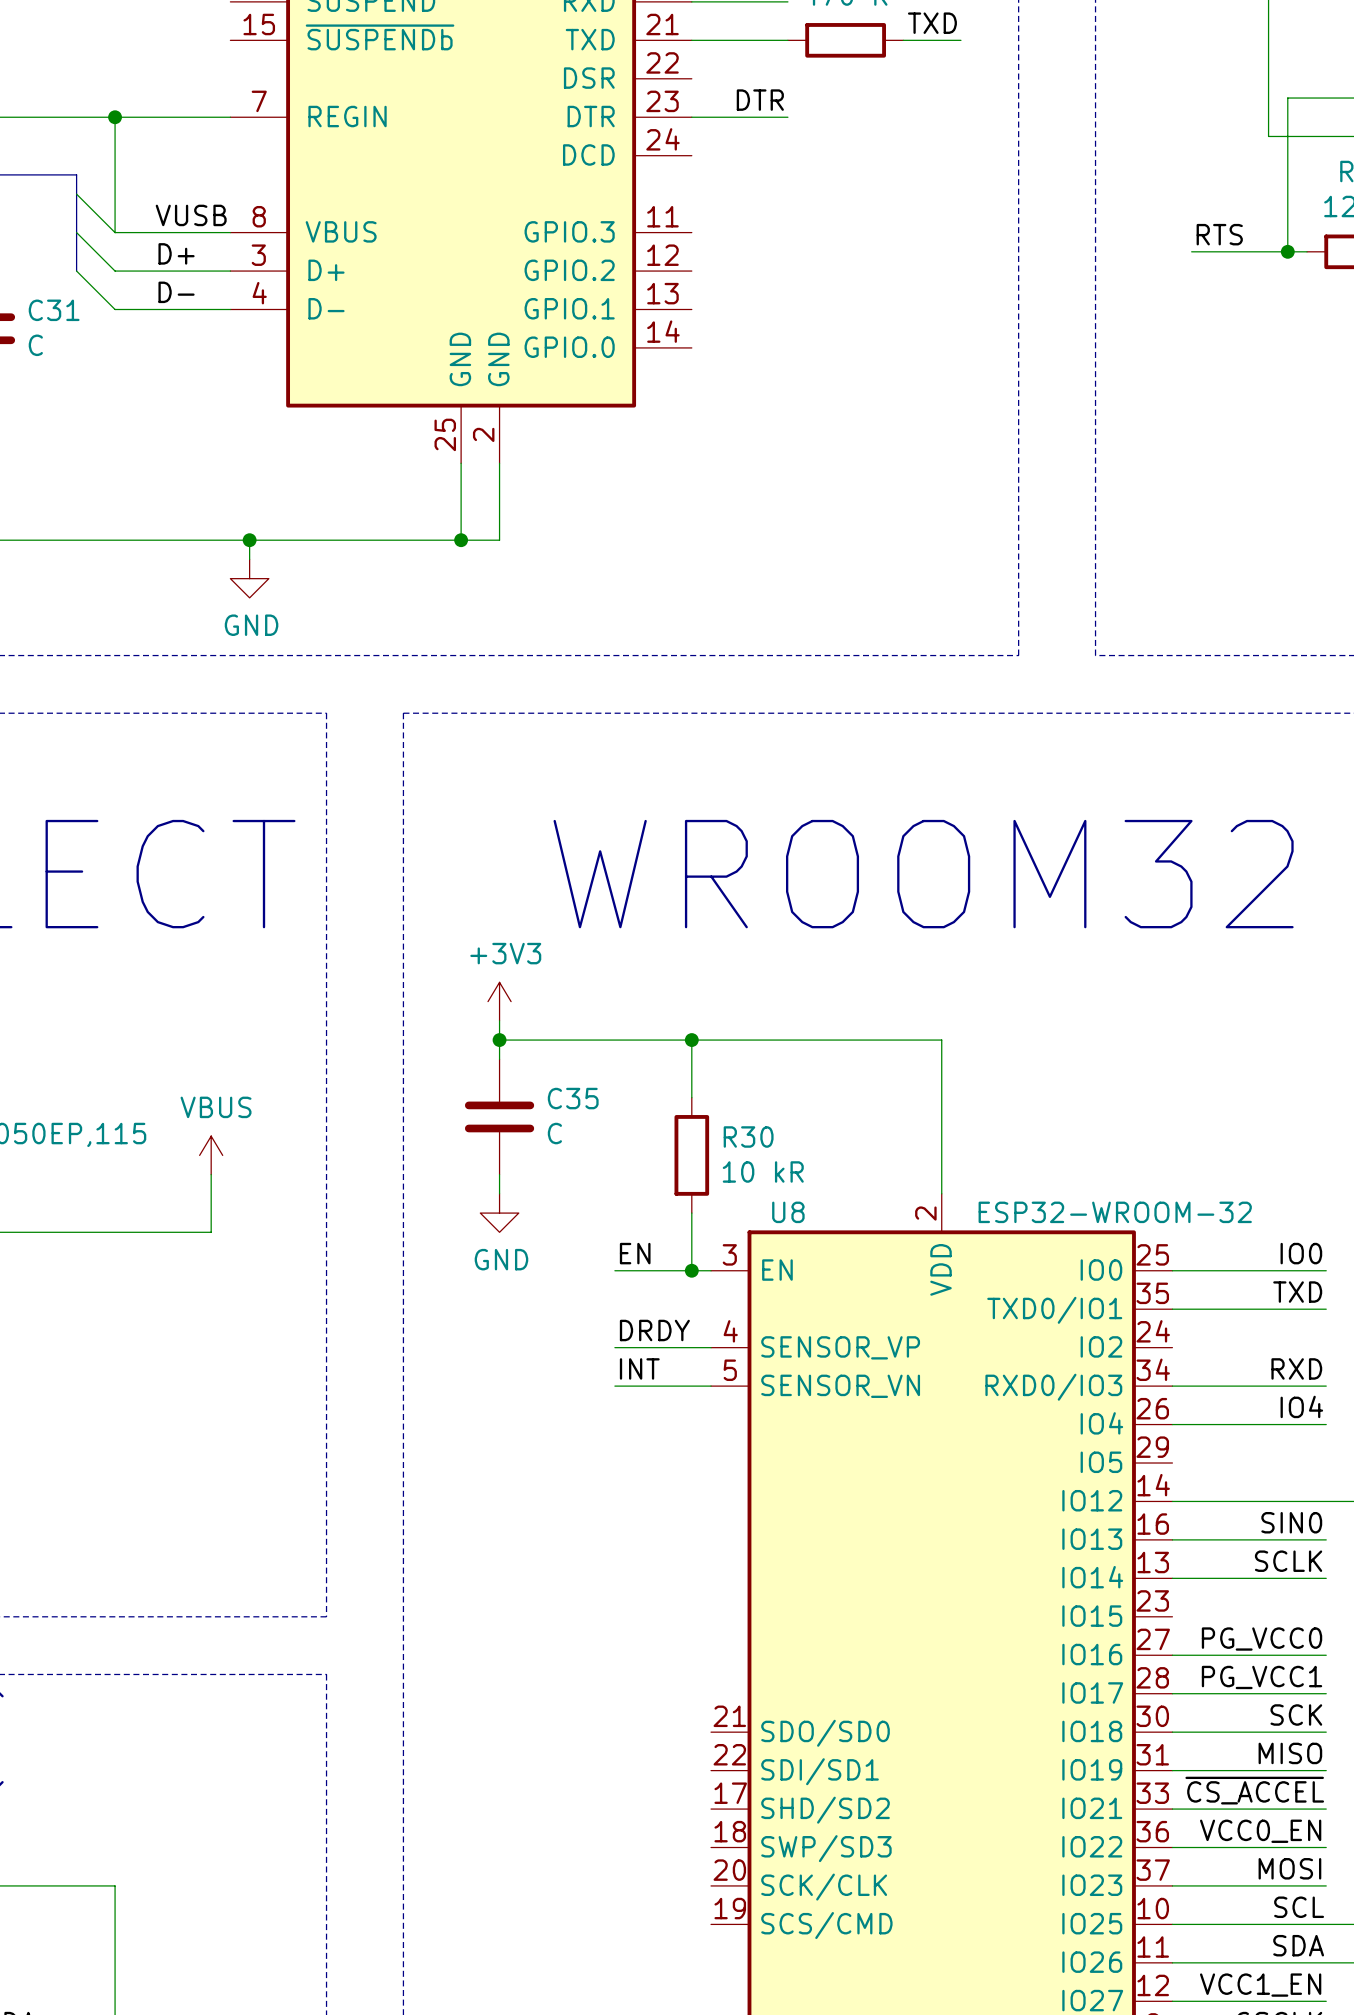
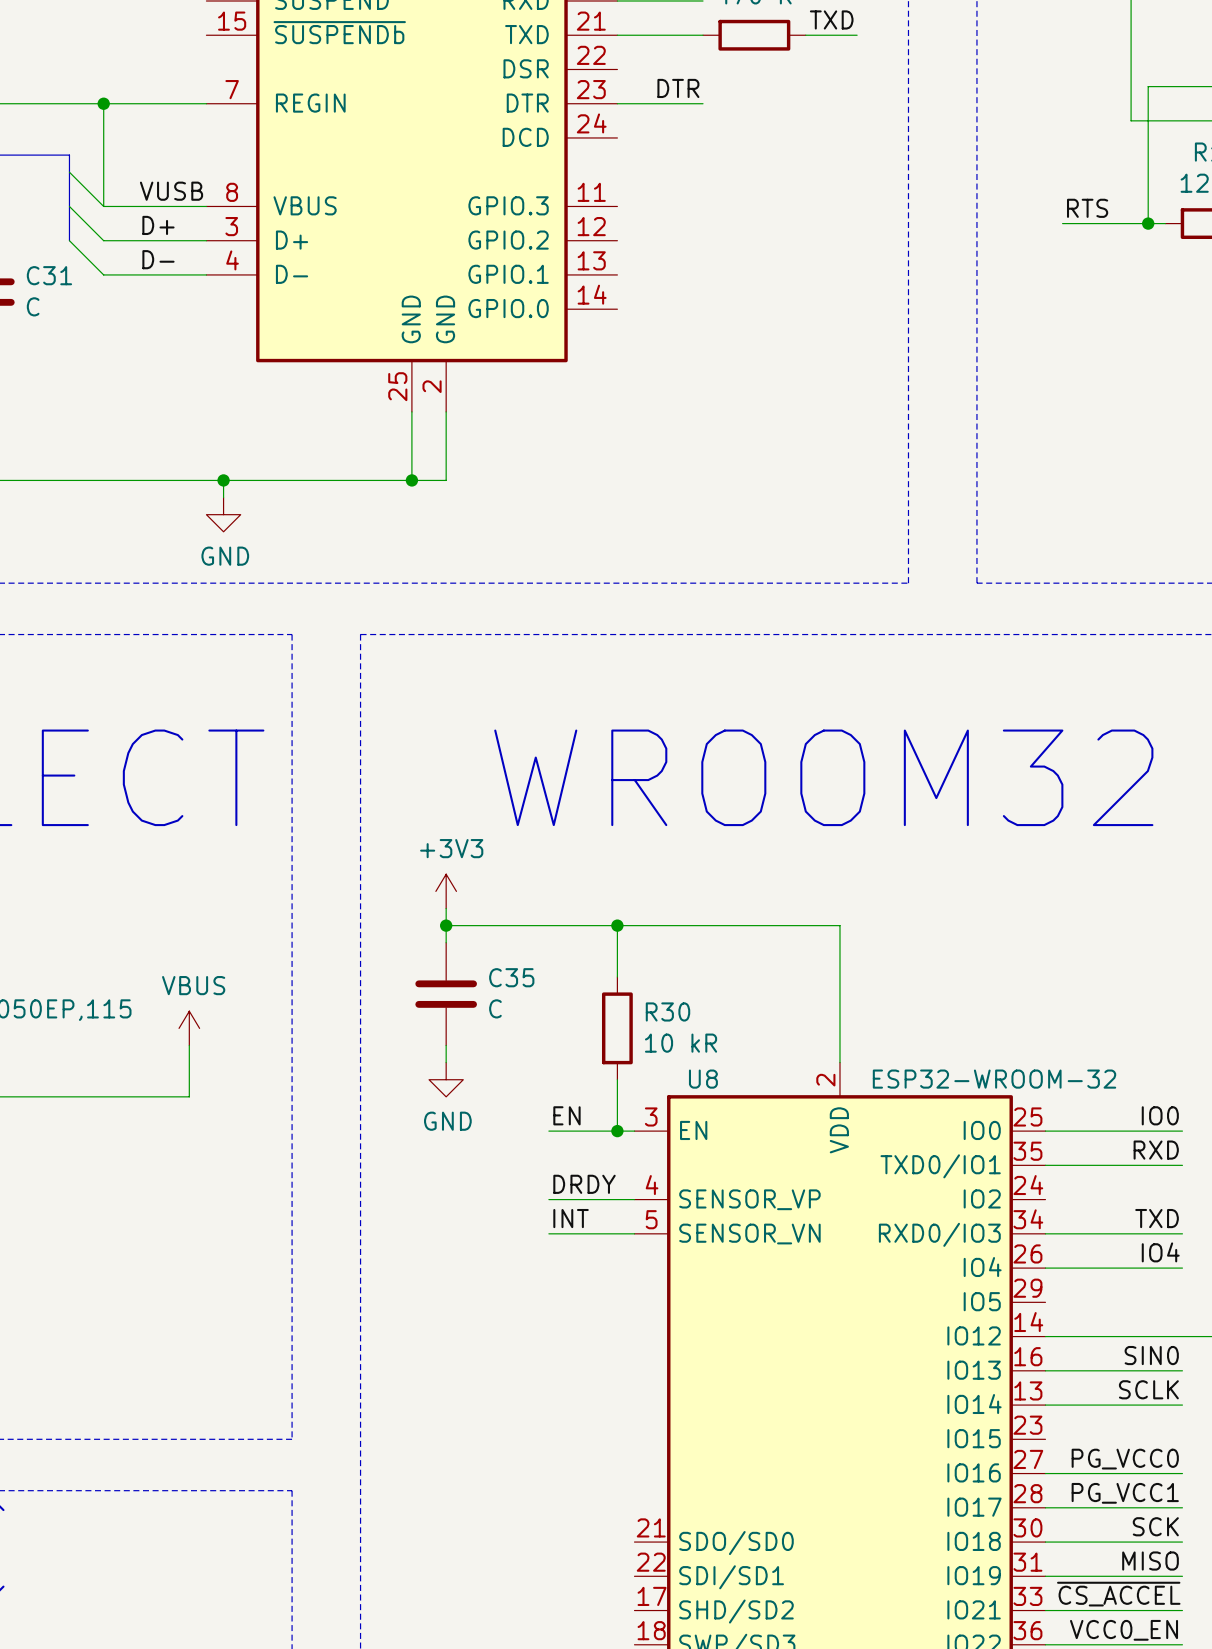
label: TXD (1297, 1292) -> RXD (1156, 1150)
label: RXD (1296, 1368) -> TXD (1157, 1218)

